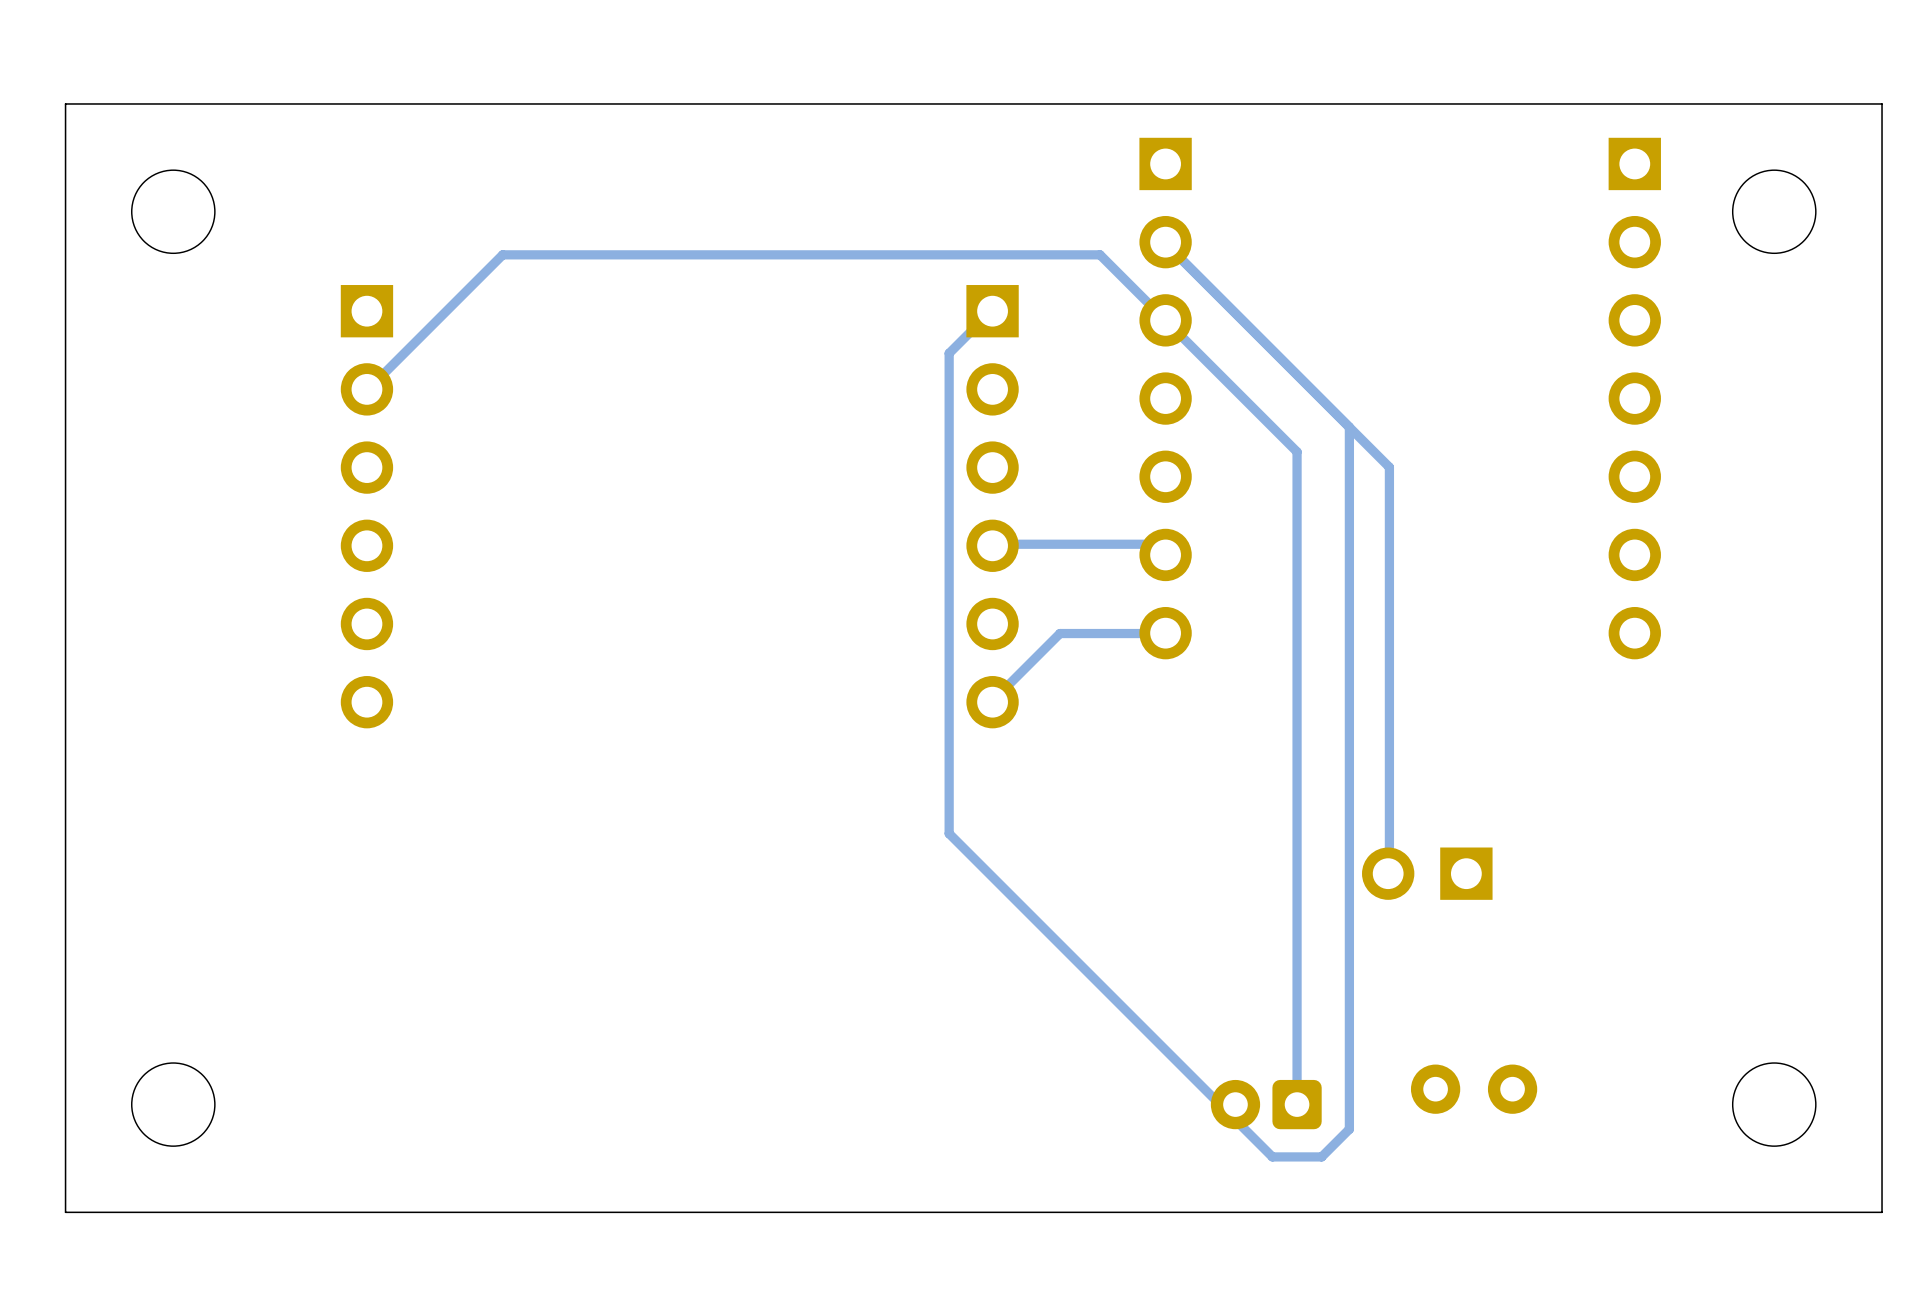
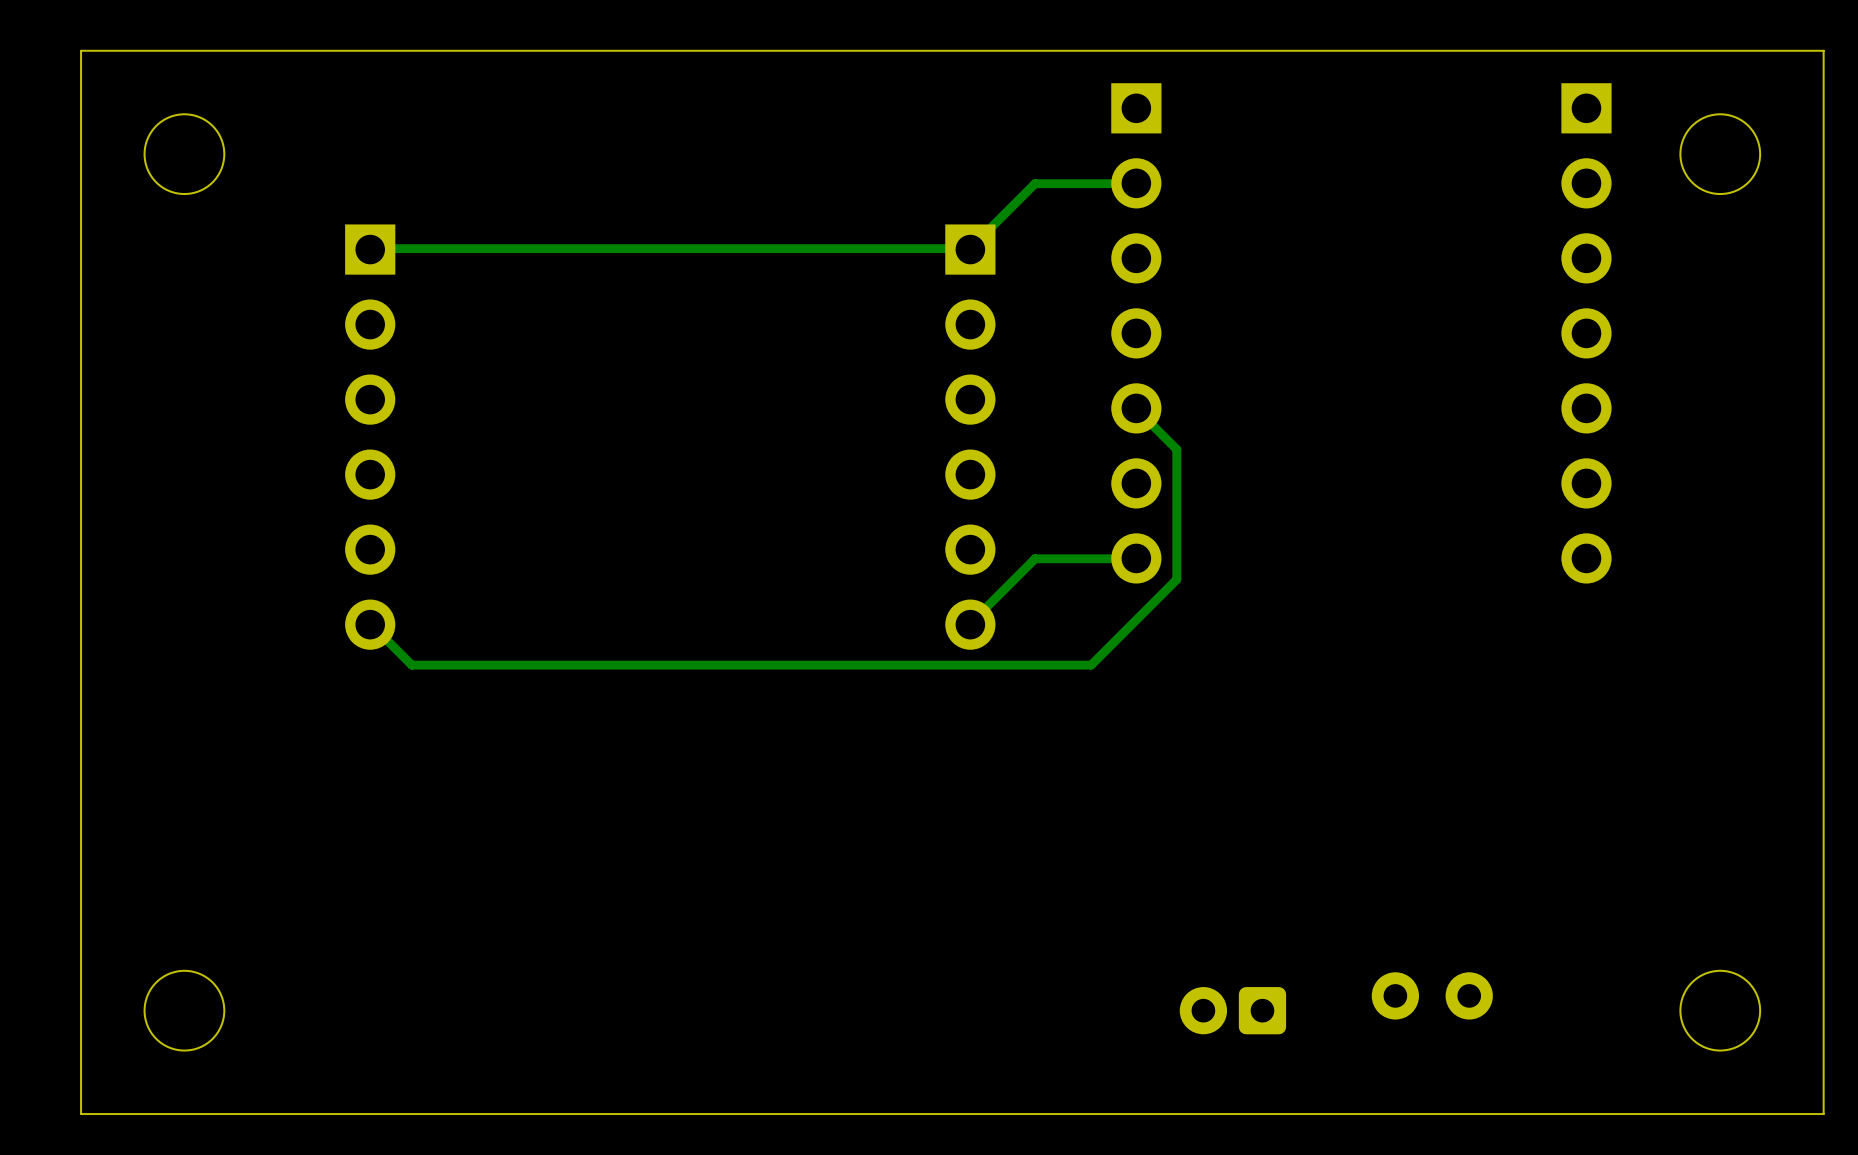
track: (1164, 242) (1389, 467) (1388, 873) -> (1135, 183) (1035, 183) (970, 248) (370, 248)
track: (992, 310) (949, 353) (949, 833) (1272, 1156) (1321, 1156) (1349, 1129) (1349, 427) -> none
track: (367, 390) (502, 254) (1100, 254) (1297, 451) (1297, 1104) -> none
track: none -> (1136, 408) (1176, 449) (1176, 579) (1091, 665) (411, 665) (370, 623)
track: (992, 545) (1155, 544) (1165, 554) -> none
part: (1427, 873) -> none

